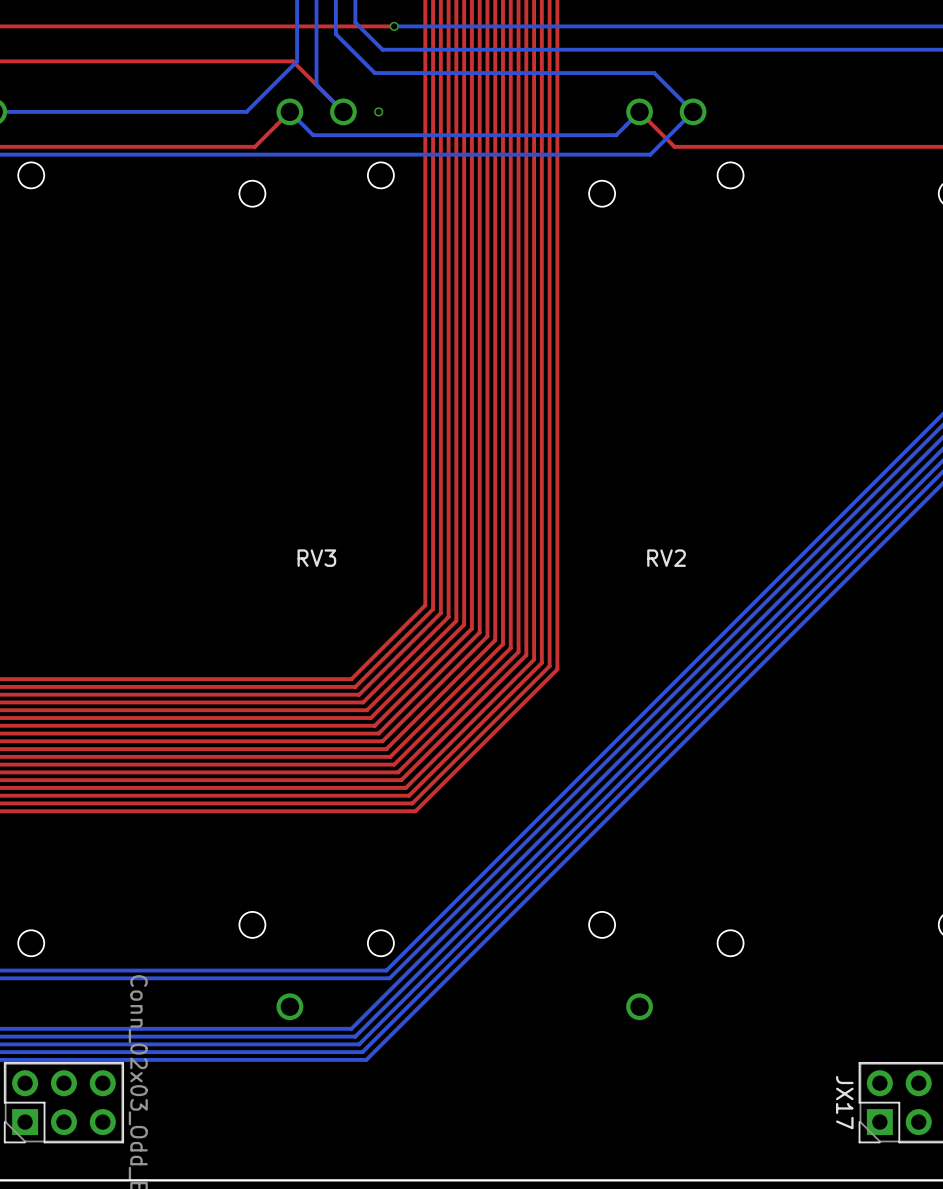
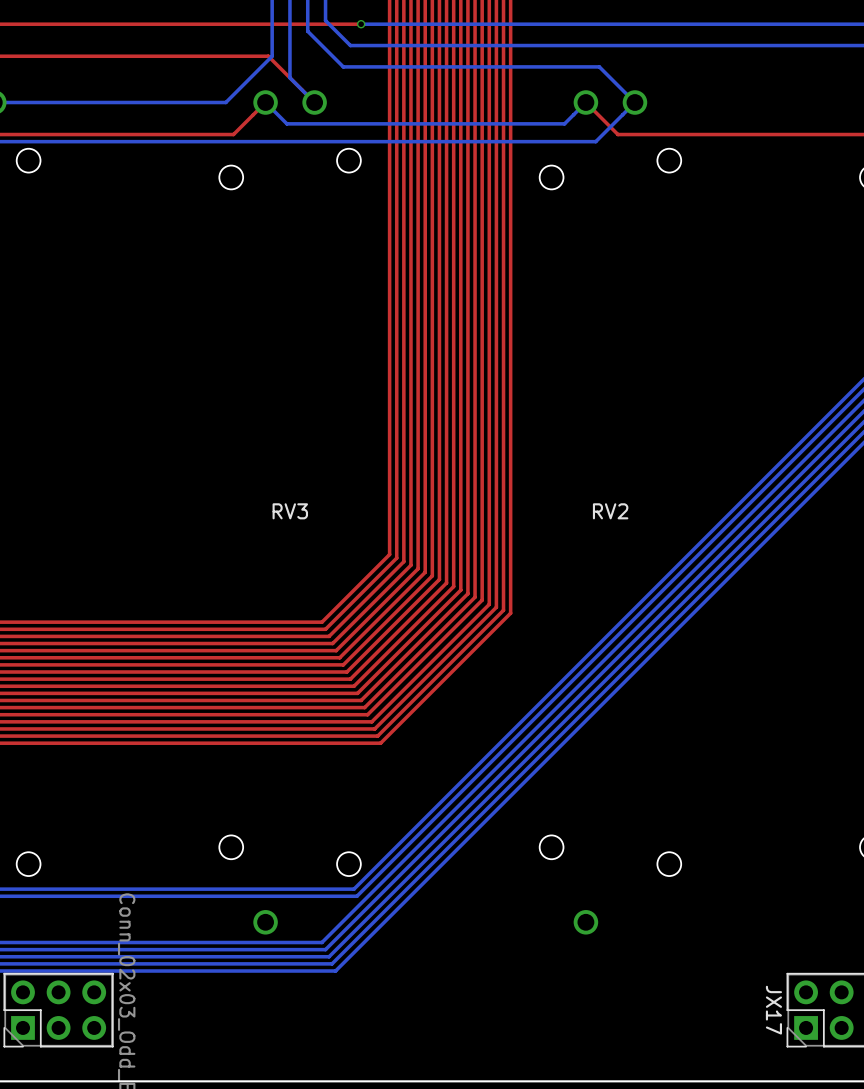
via: (378, 111) -> none

